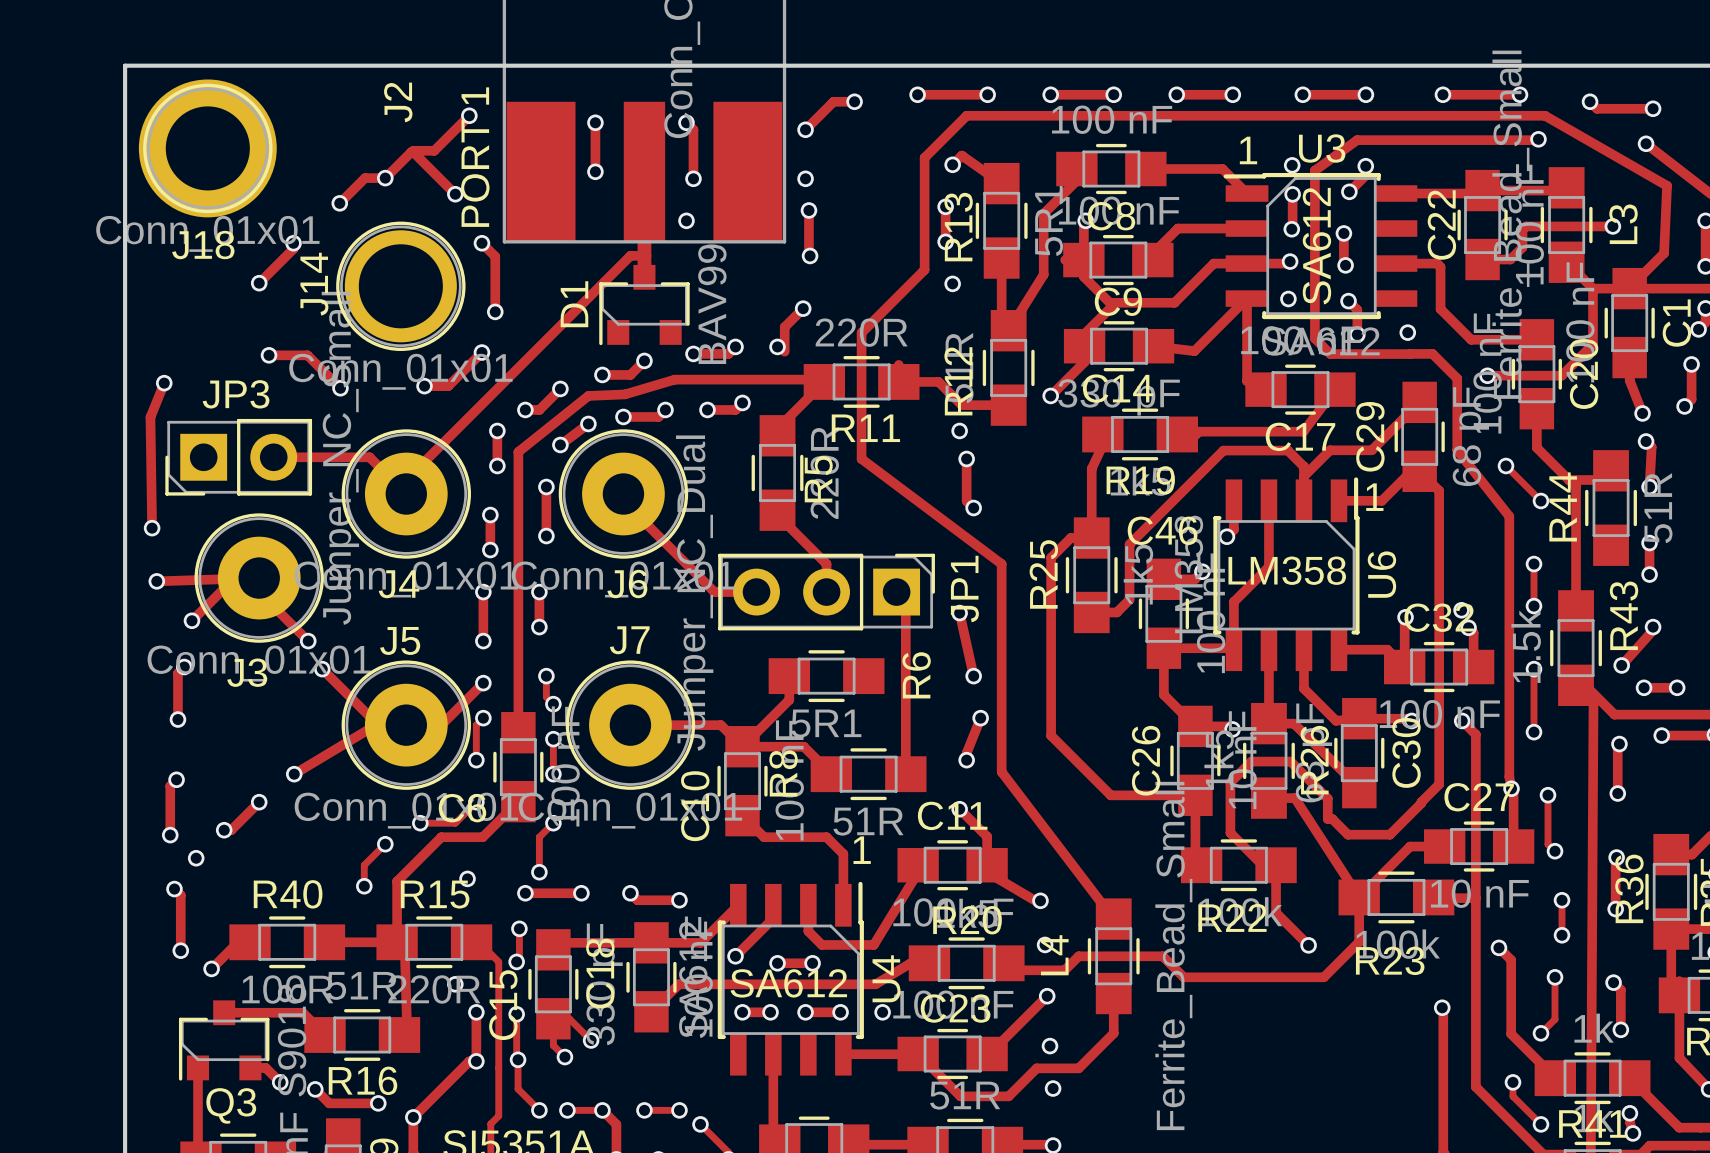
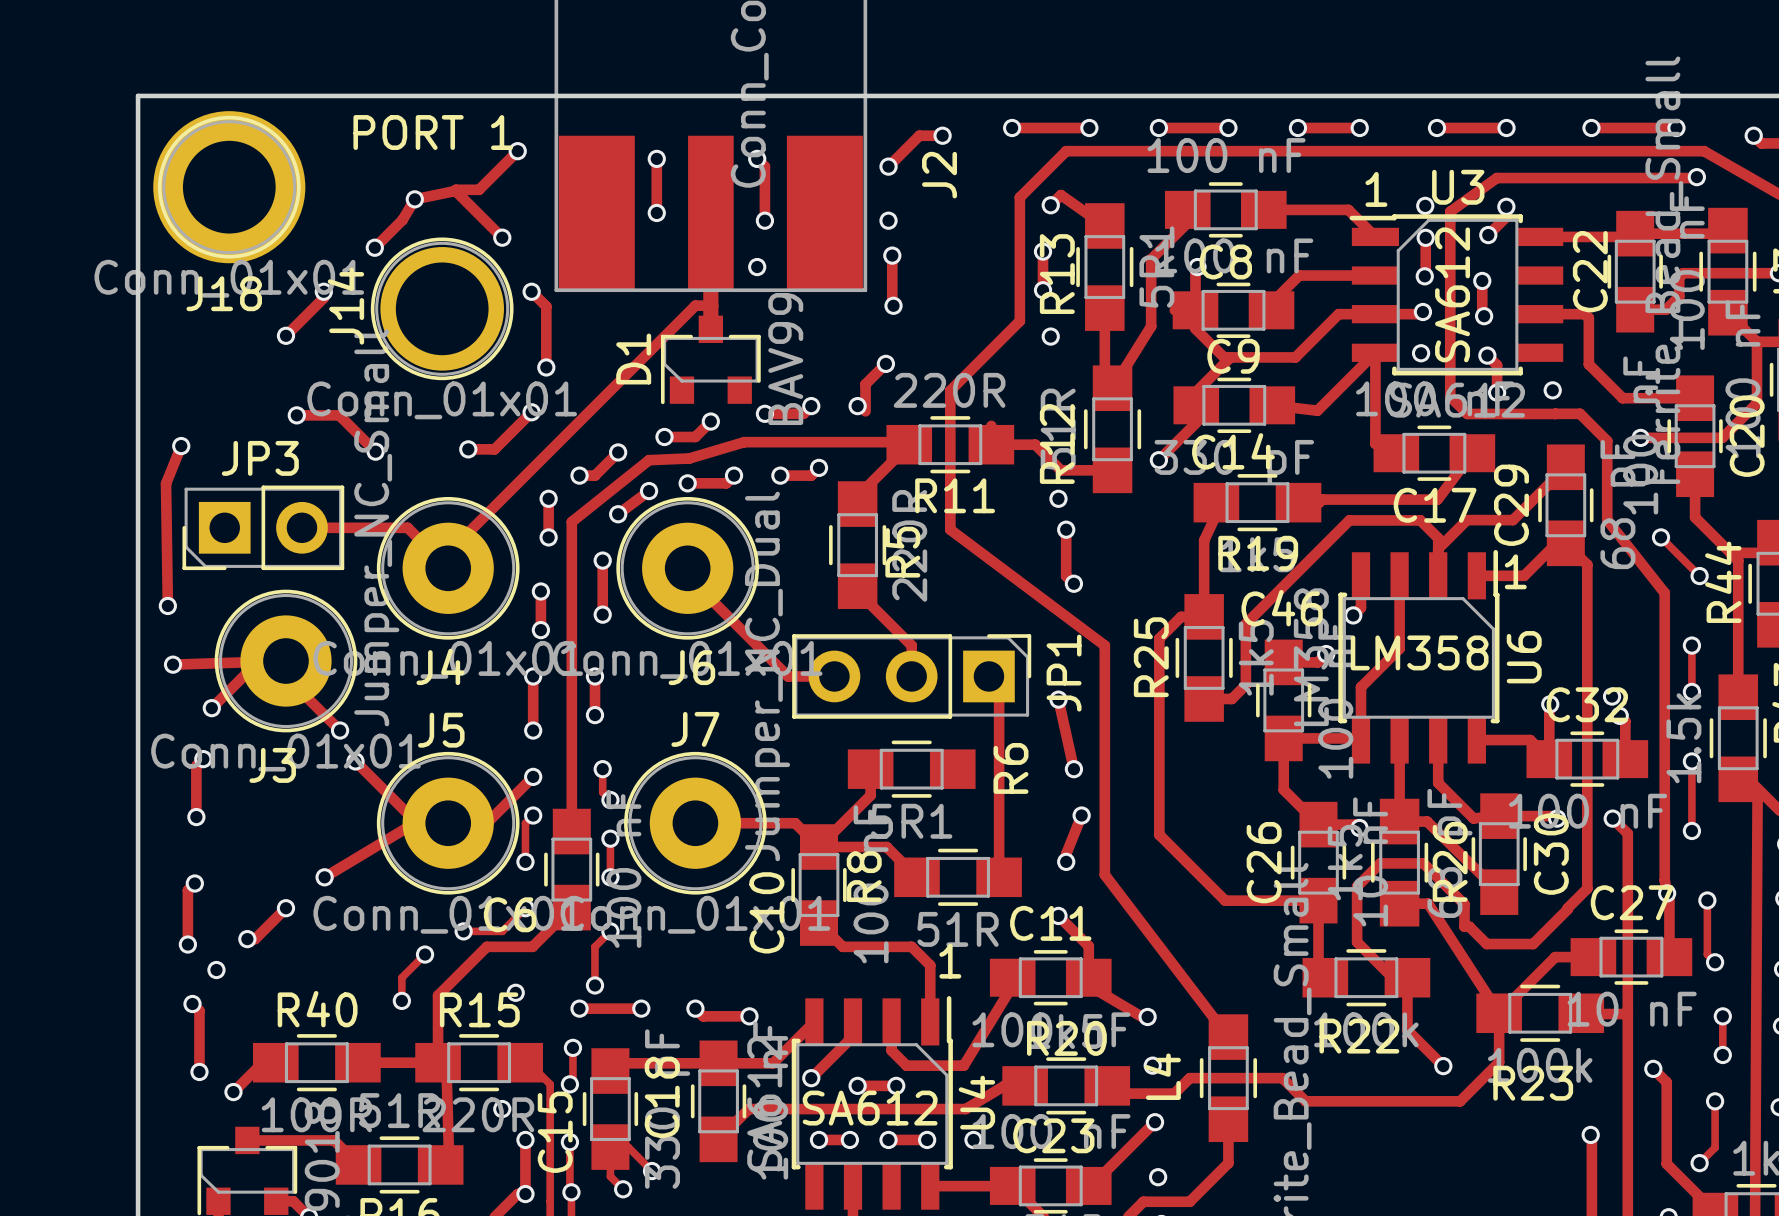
J2 name position: J2 (398, 102) -> J2 (939, 175)
track: (411, 152) (385, 178) (364, 178) -> (453, 191) (414, 199) (402, 219)
text rotation: 0° (475, 157) -> 90° clockwise (433, 132)
via position: (385, 178) -> (414, 199)
J14 position: (400, 286) -> (442, 308)

